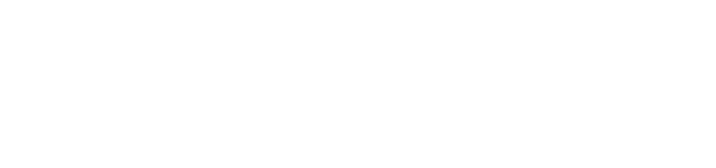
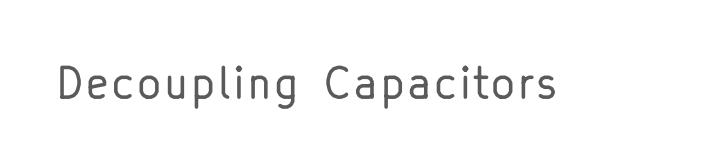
text: none -> Decoupling Capacitors (307, 87)

